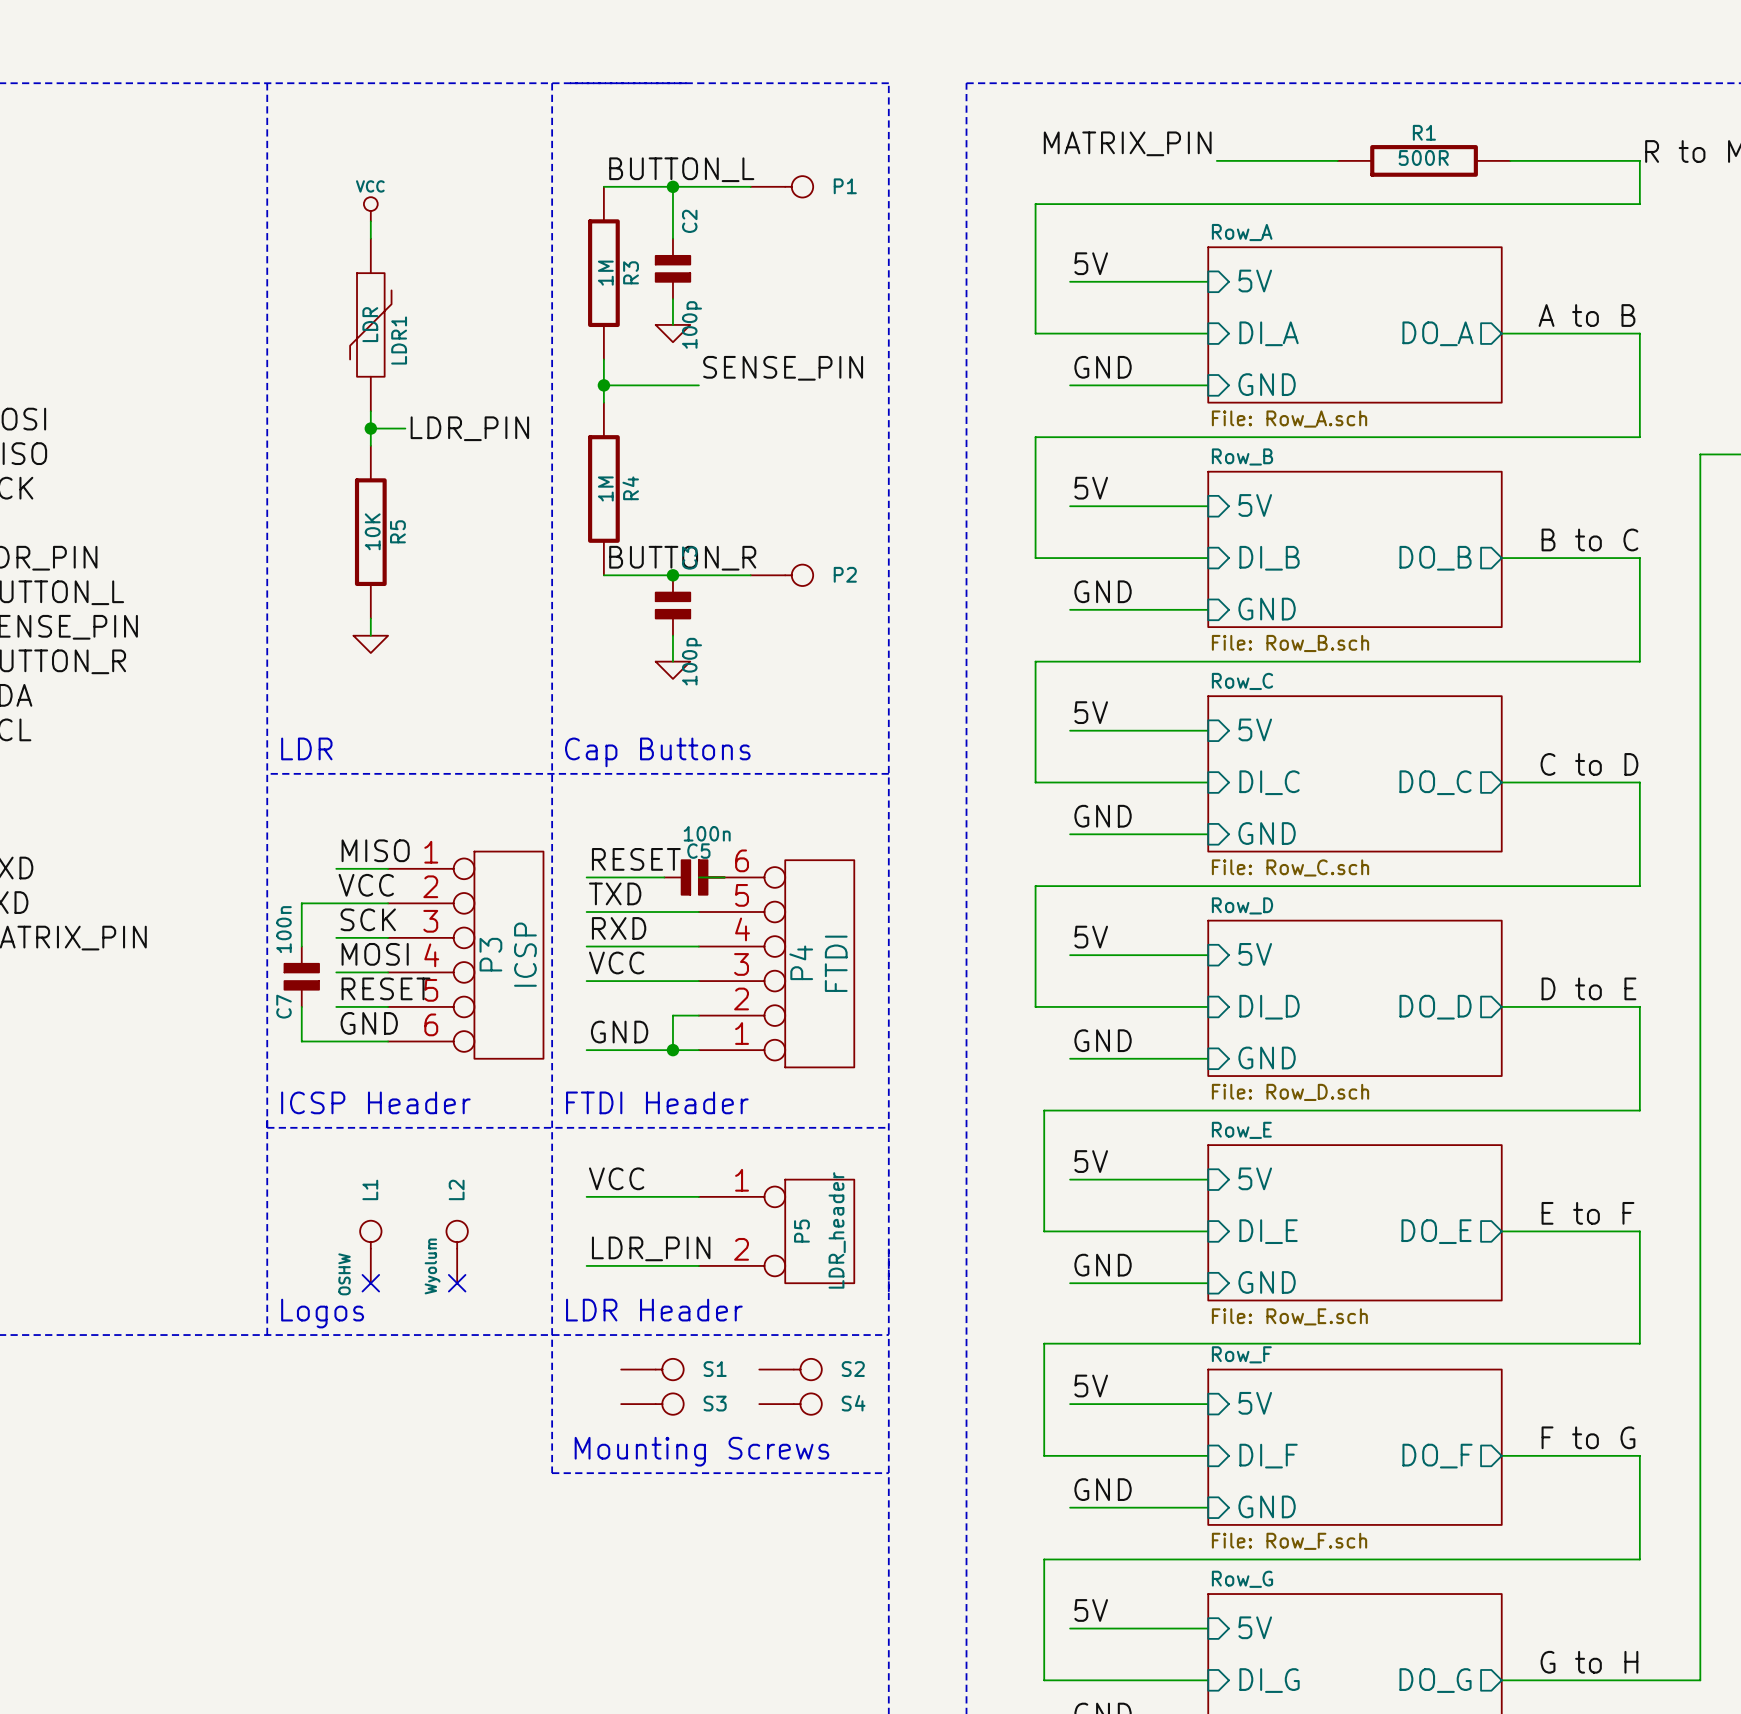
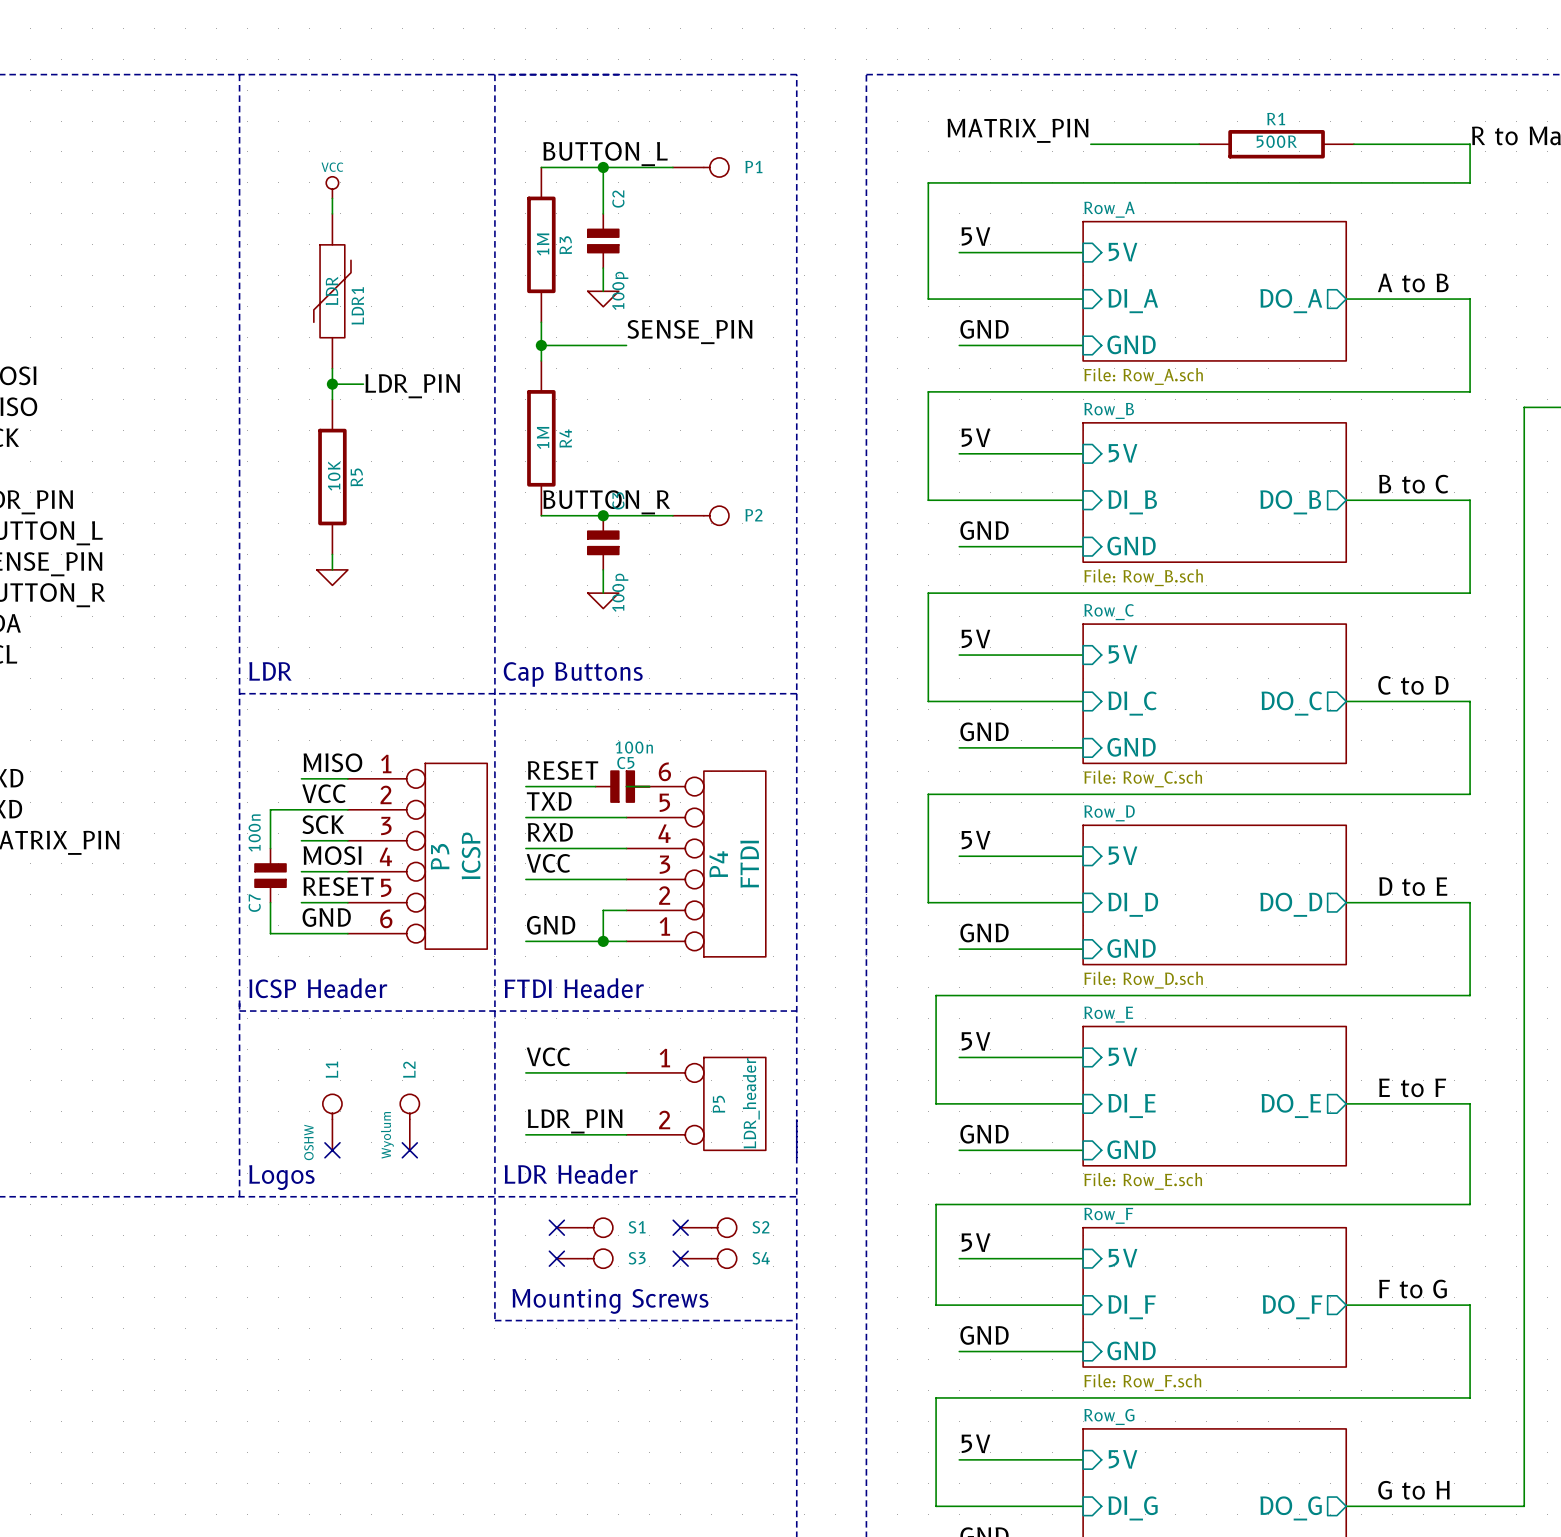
no-connect mark: none -> (556, 1227)
no-connect mark: none -> (680, 1227)
no-connect mark: none -> (556, 1258)
no-connect mark: none -> (680, 1258)

